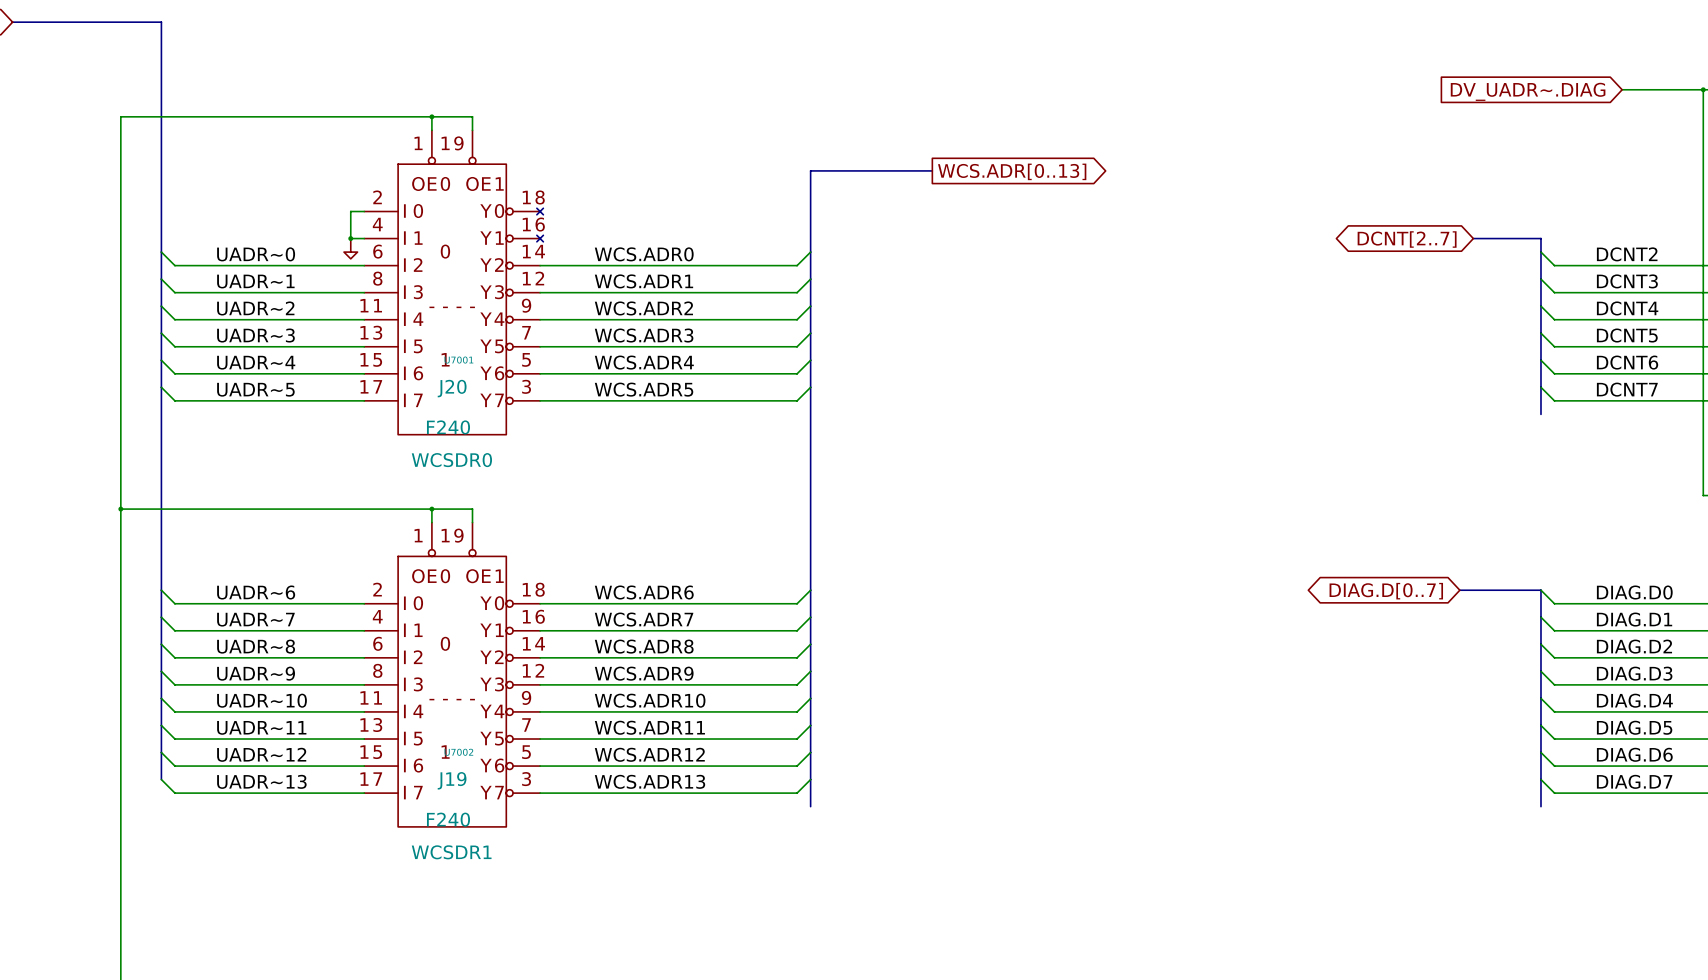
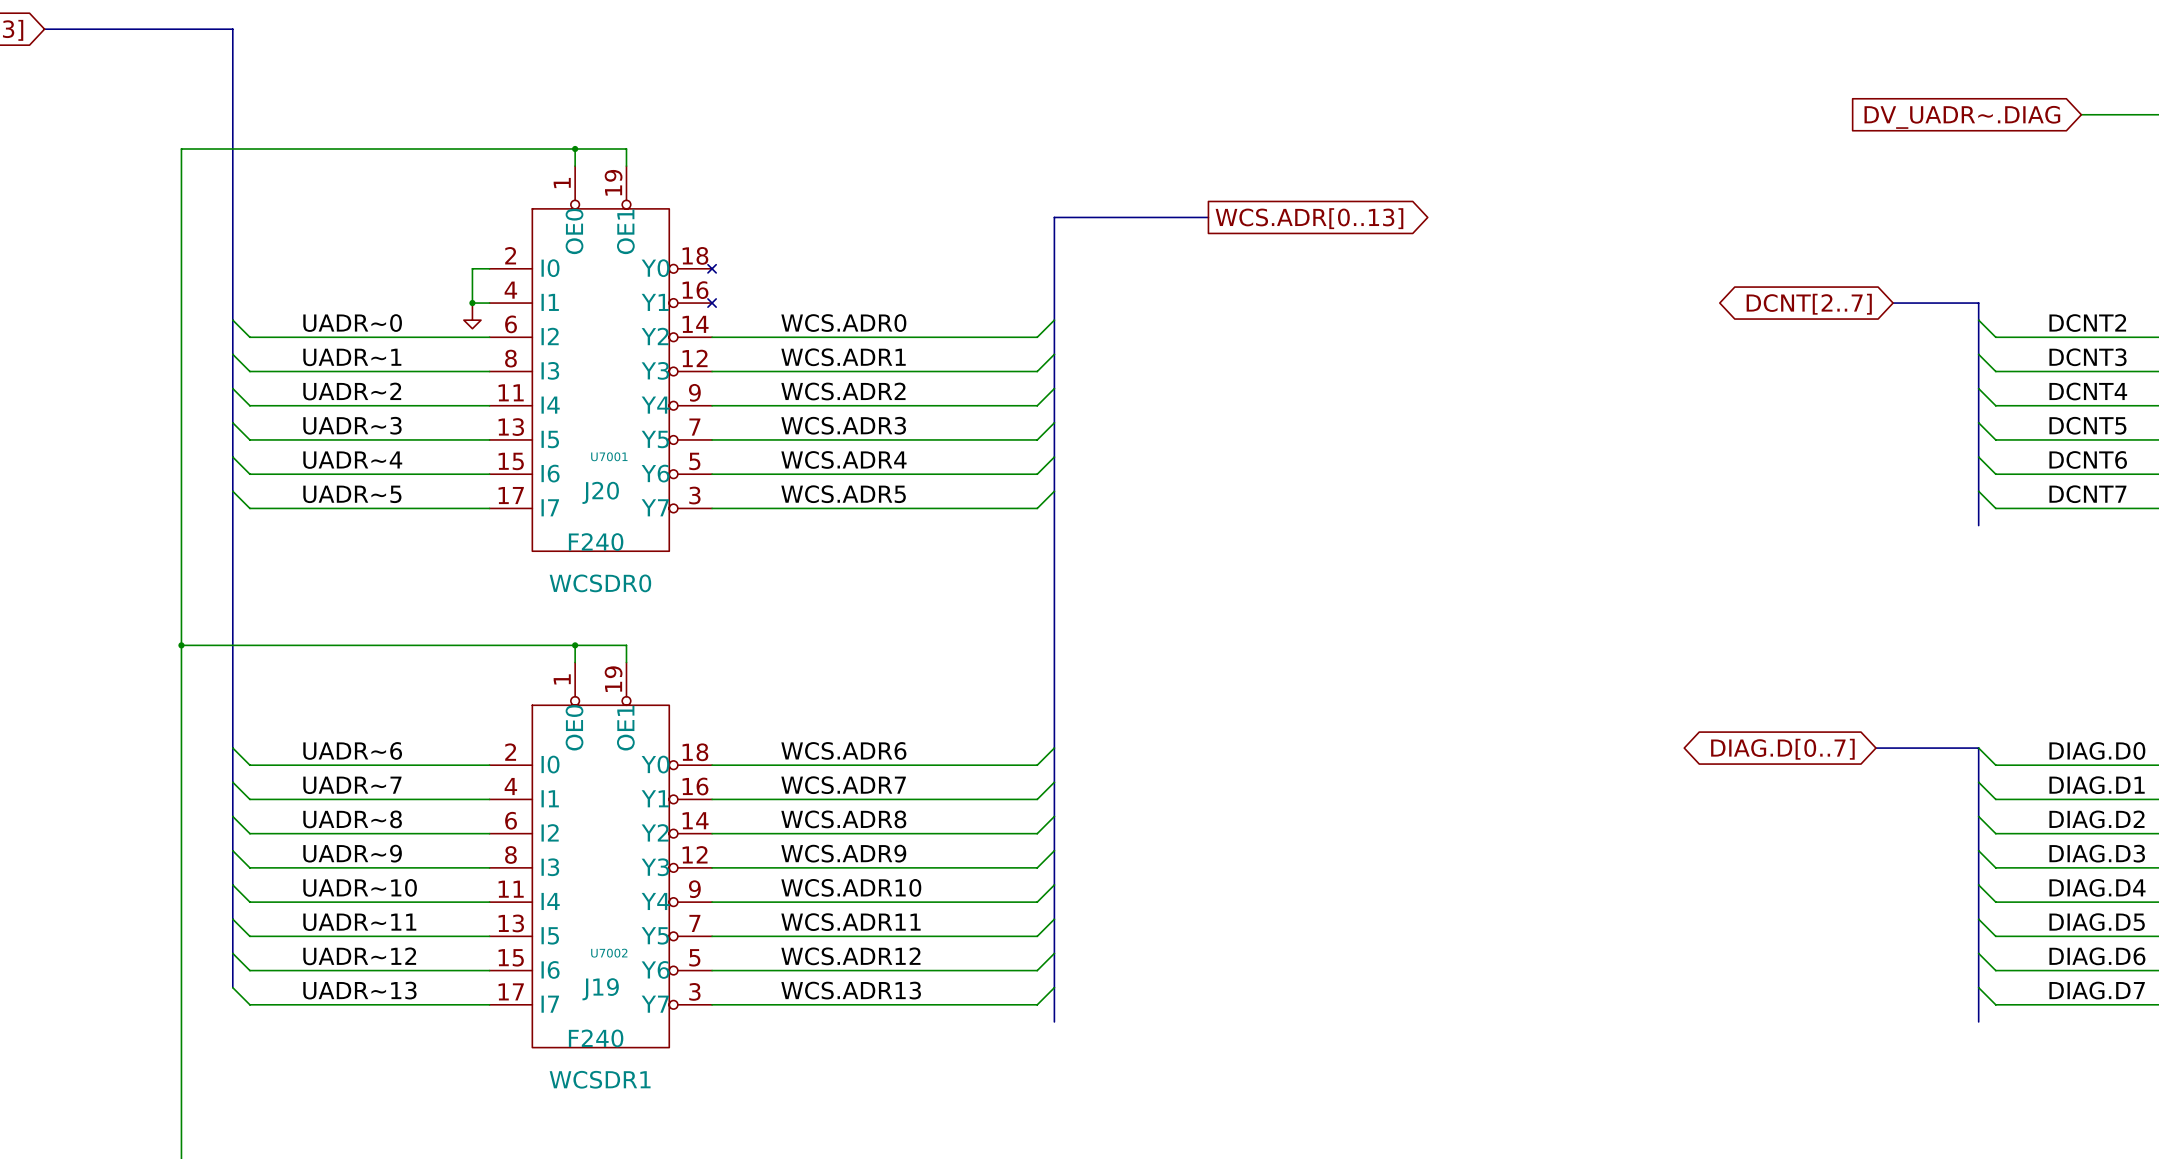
U7001 symbol: [364, 130, 541, 435] -> [489, 166, 713, 552]
U7002 symbol: [364, 522, 541, 827] -> [489, 662, 713, 1048]

